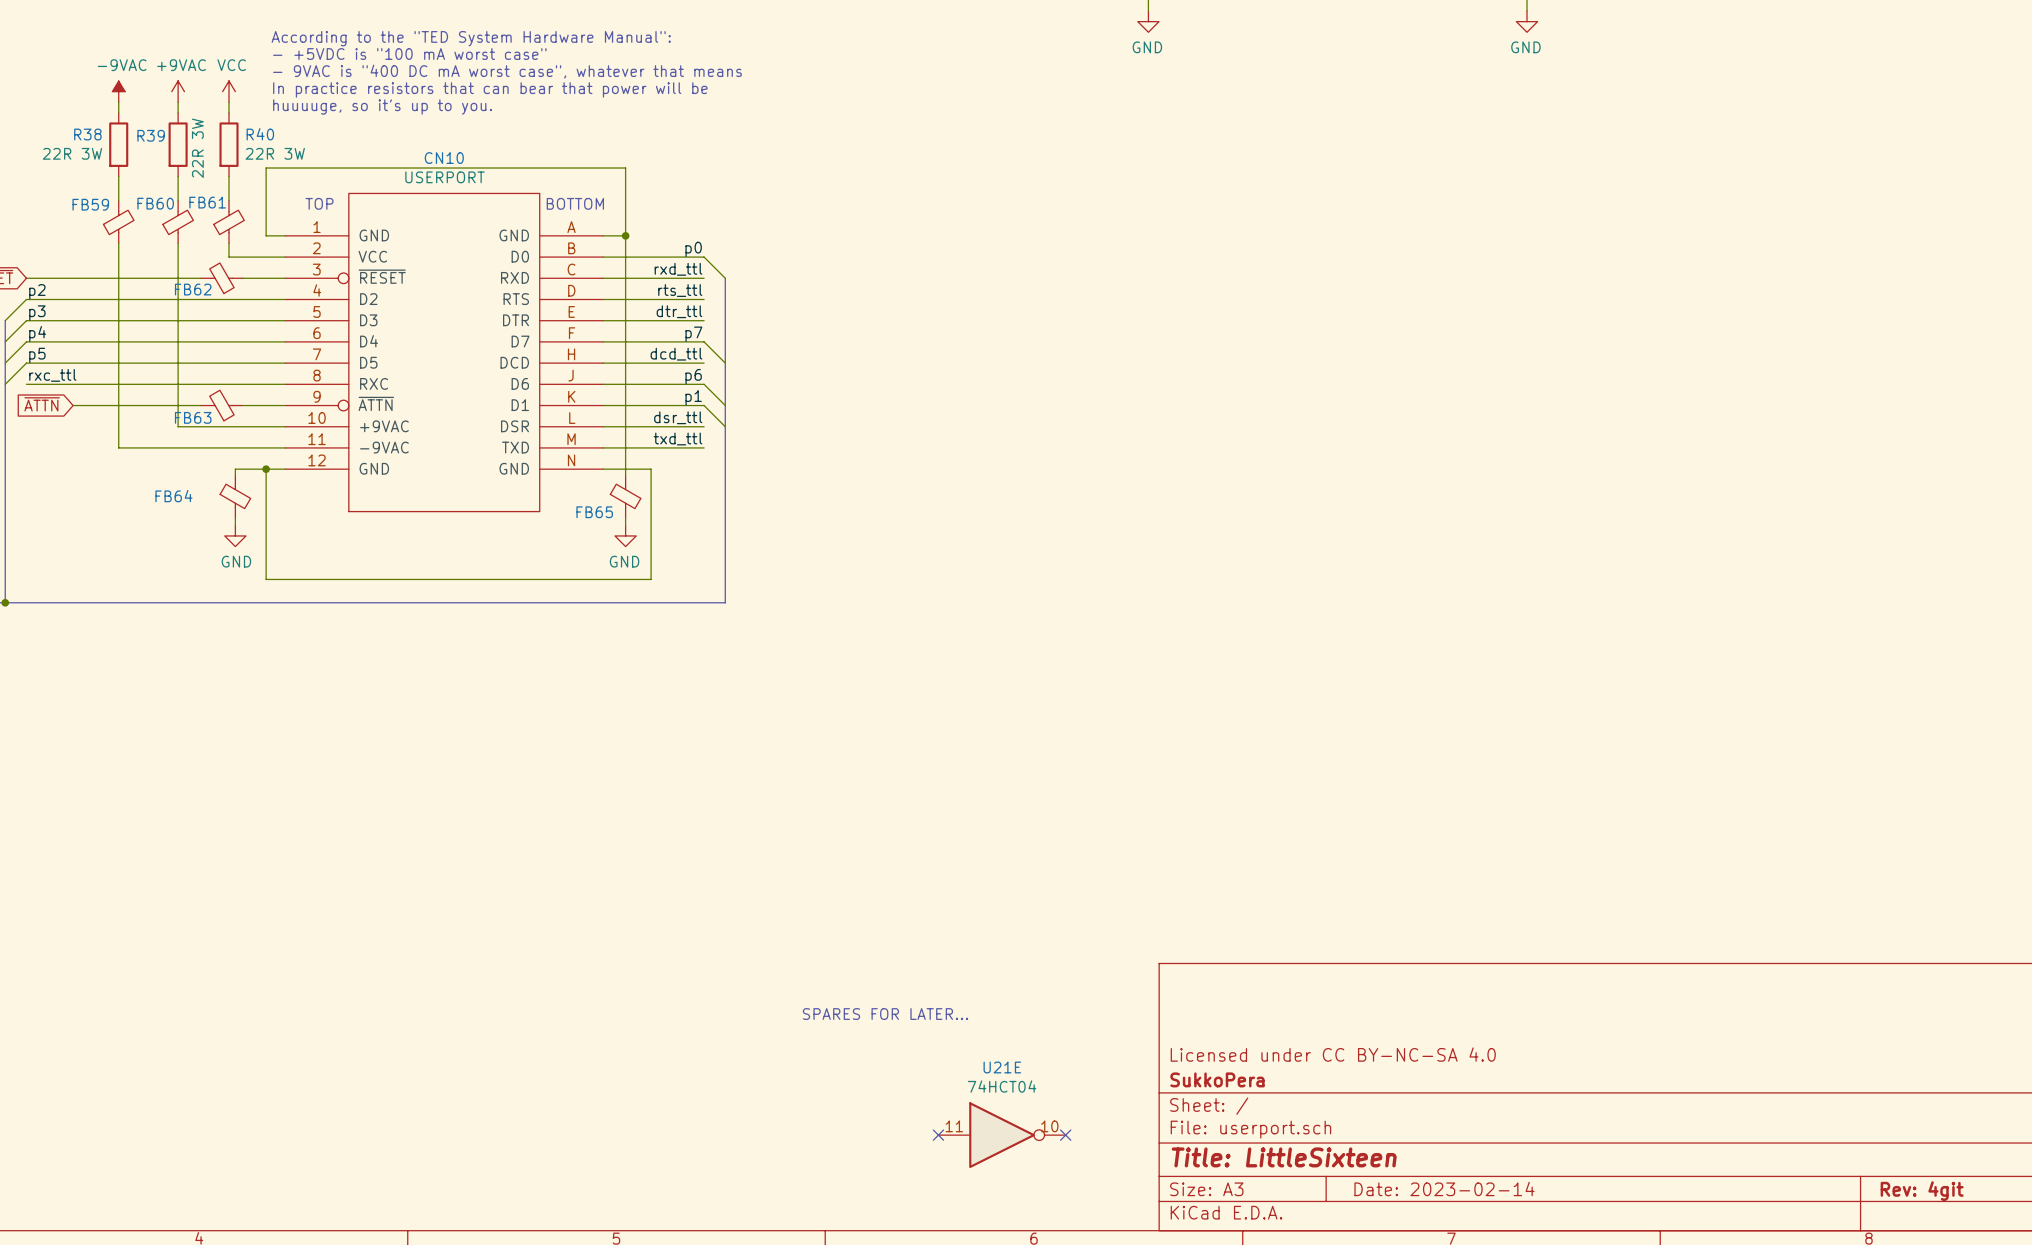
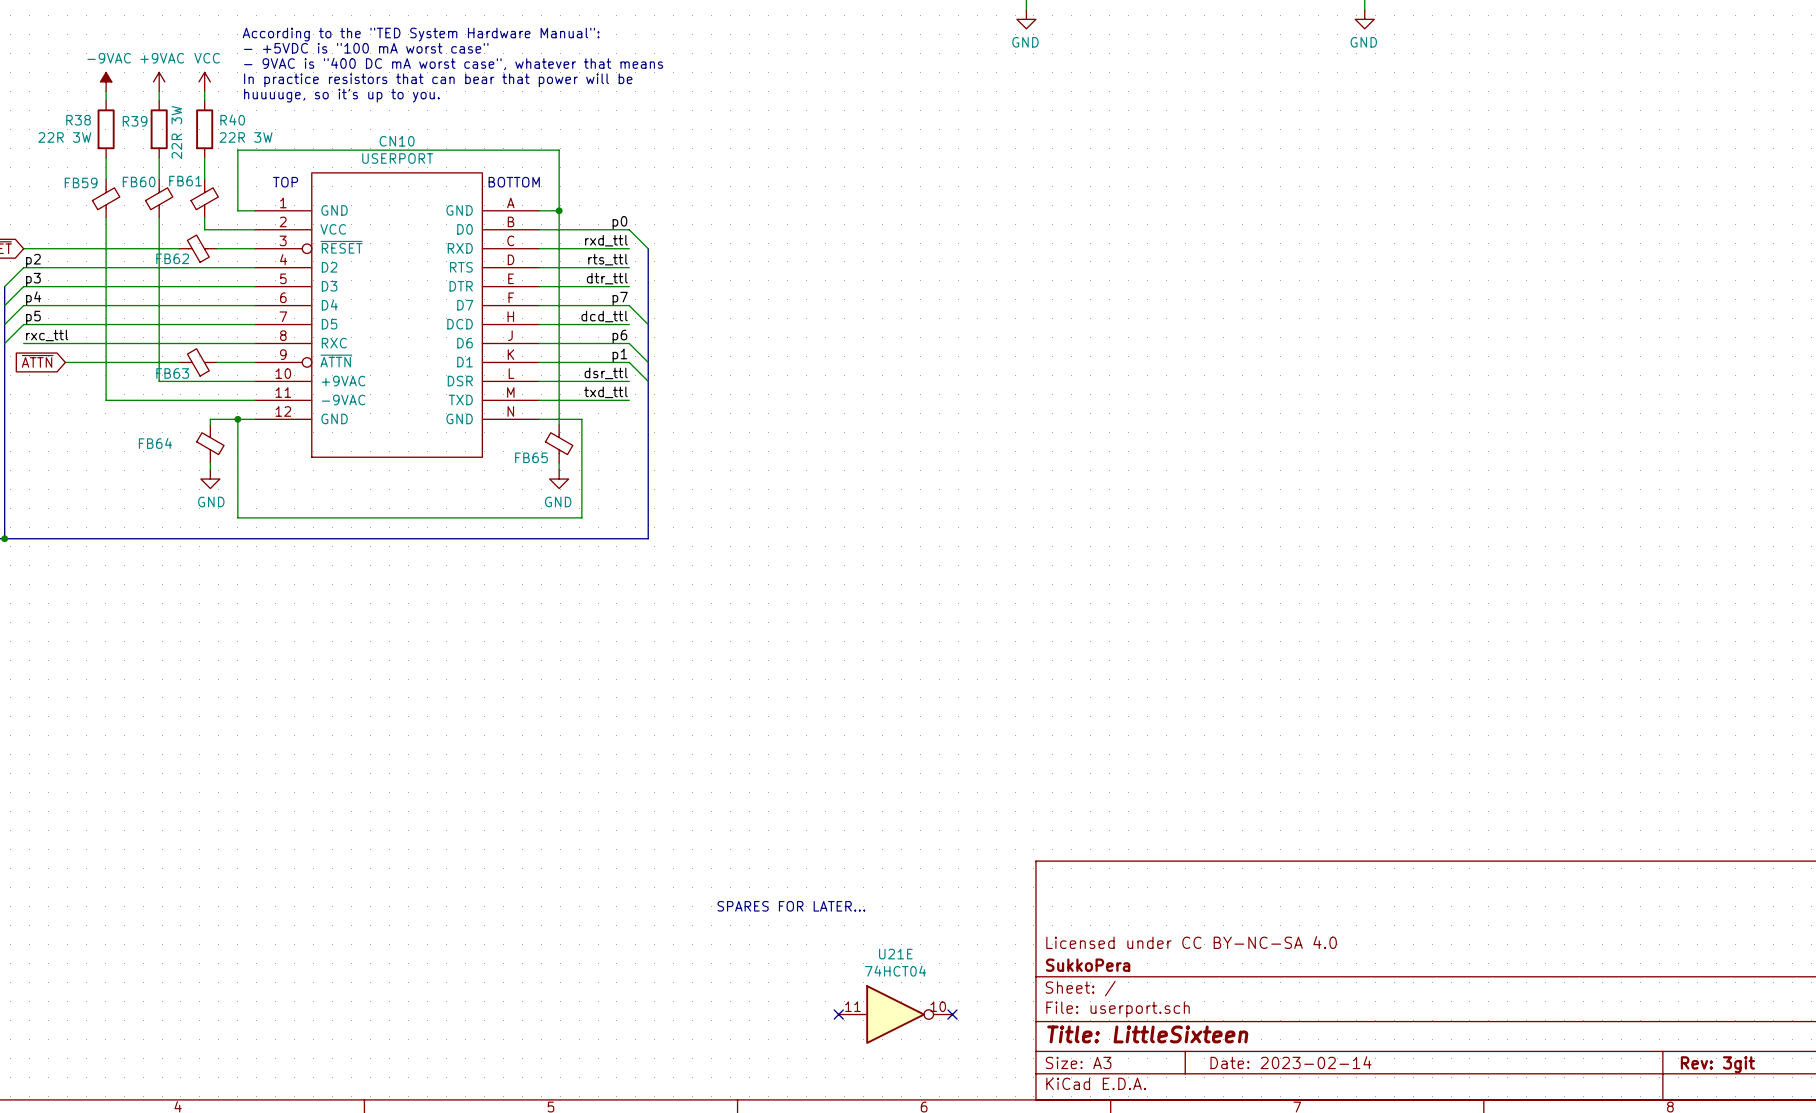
title block: Rev: 4git (1922, 1191) -> Rev: 3git (1717, 1064)

